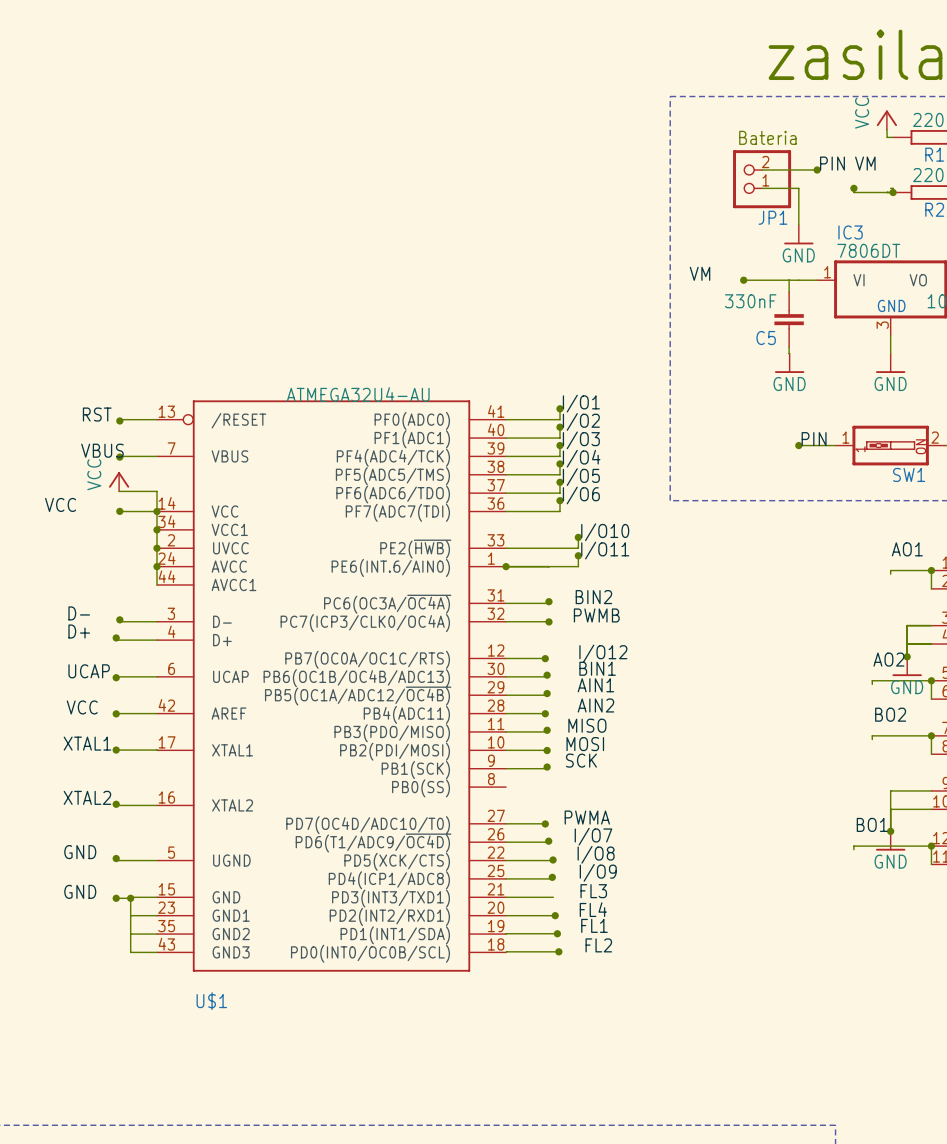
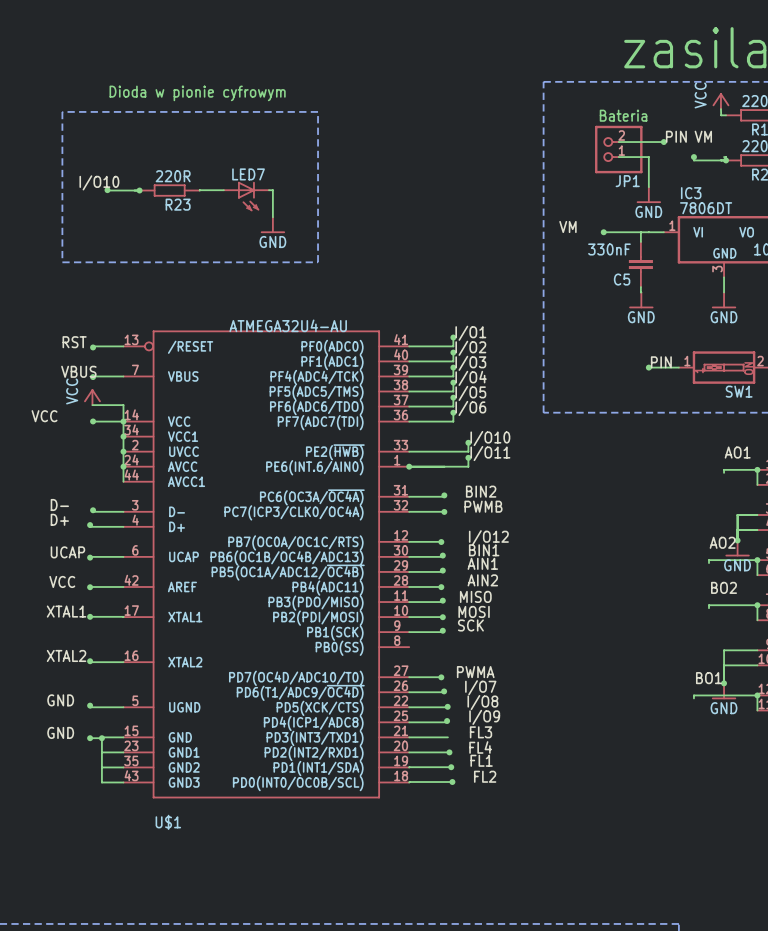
text: none -> Dioda w pionie cyfrowym (197, 93)
bus: none -> (62, 111) (62, 262) (318, 262) (318, 111) (62, 111)
label: none -> I/O10 (99, 182)
wire: none -> (107, 190) (139, 190)
junction: none -> (107, 190)
wire: none -> (223, 190) (199, 190)
wire: none -> (269, 190) (272, 190) (272, 217)
junction: none -> (139, 190)
R23: none -> 220R (169, 190)
LED7: none -> (246, 196)
power symbol: none -> GND (272, 225)

